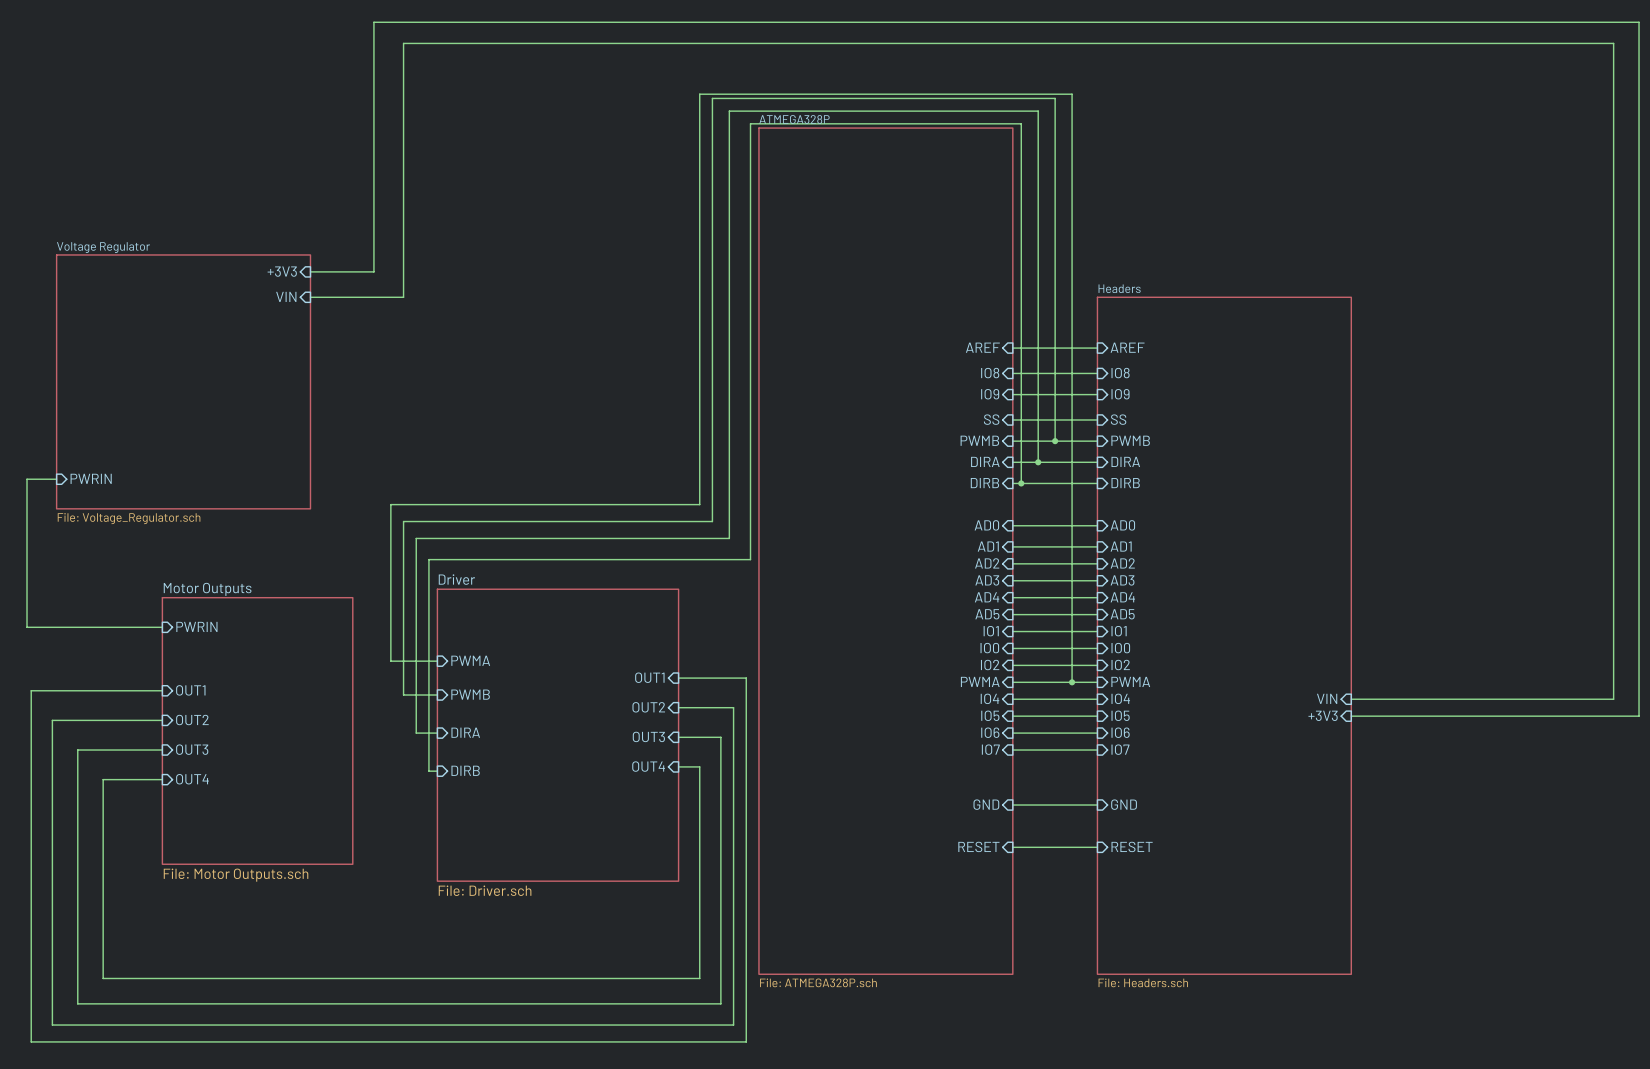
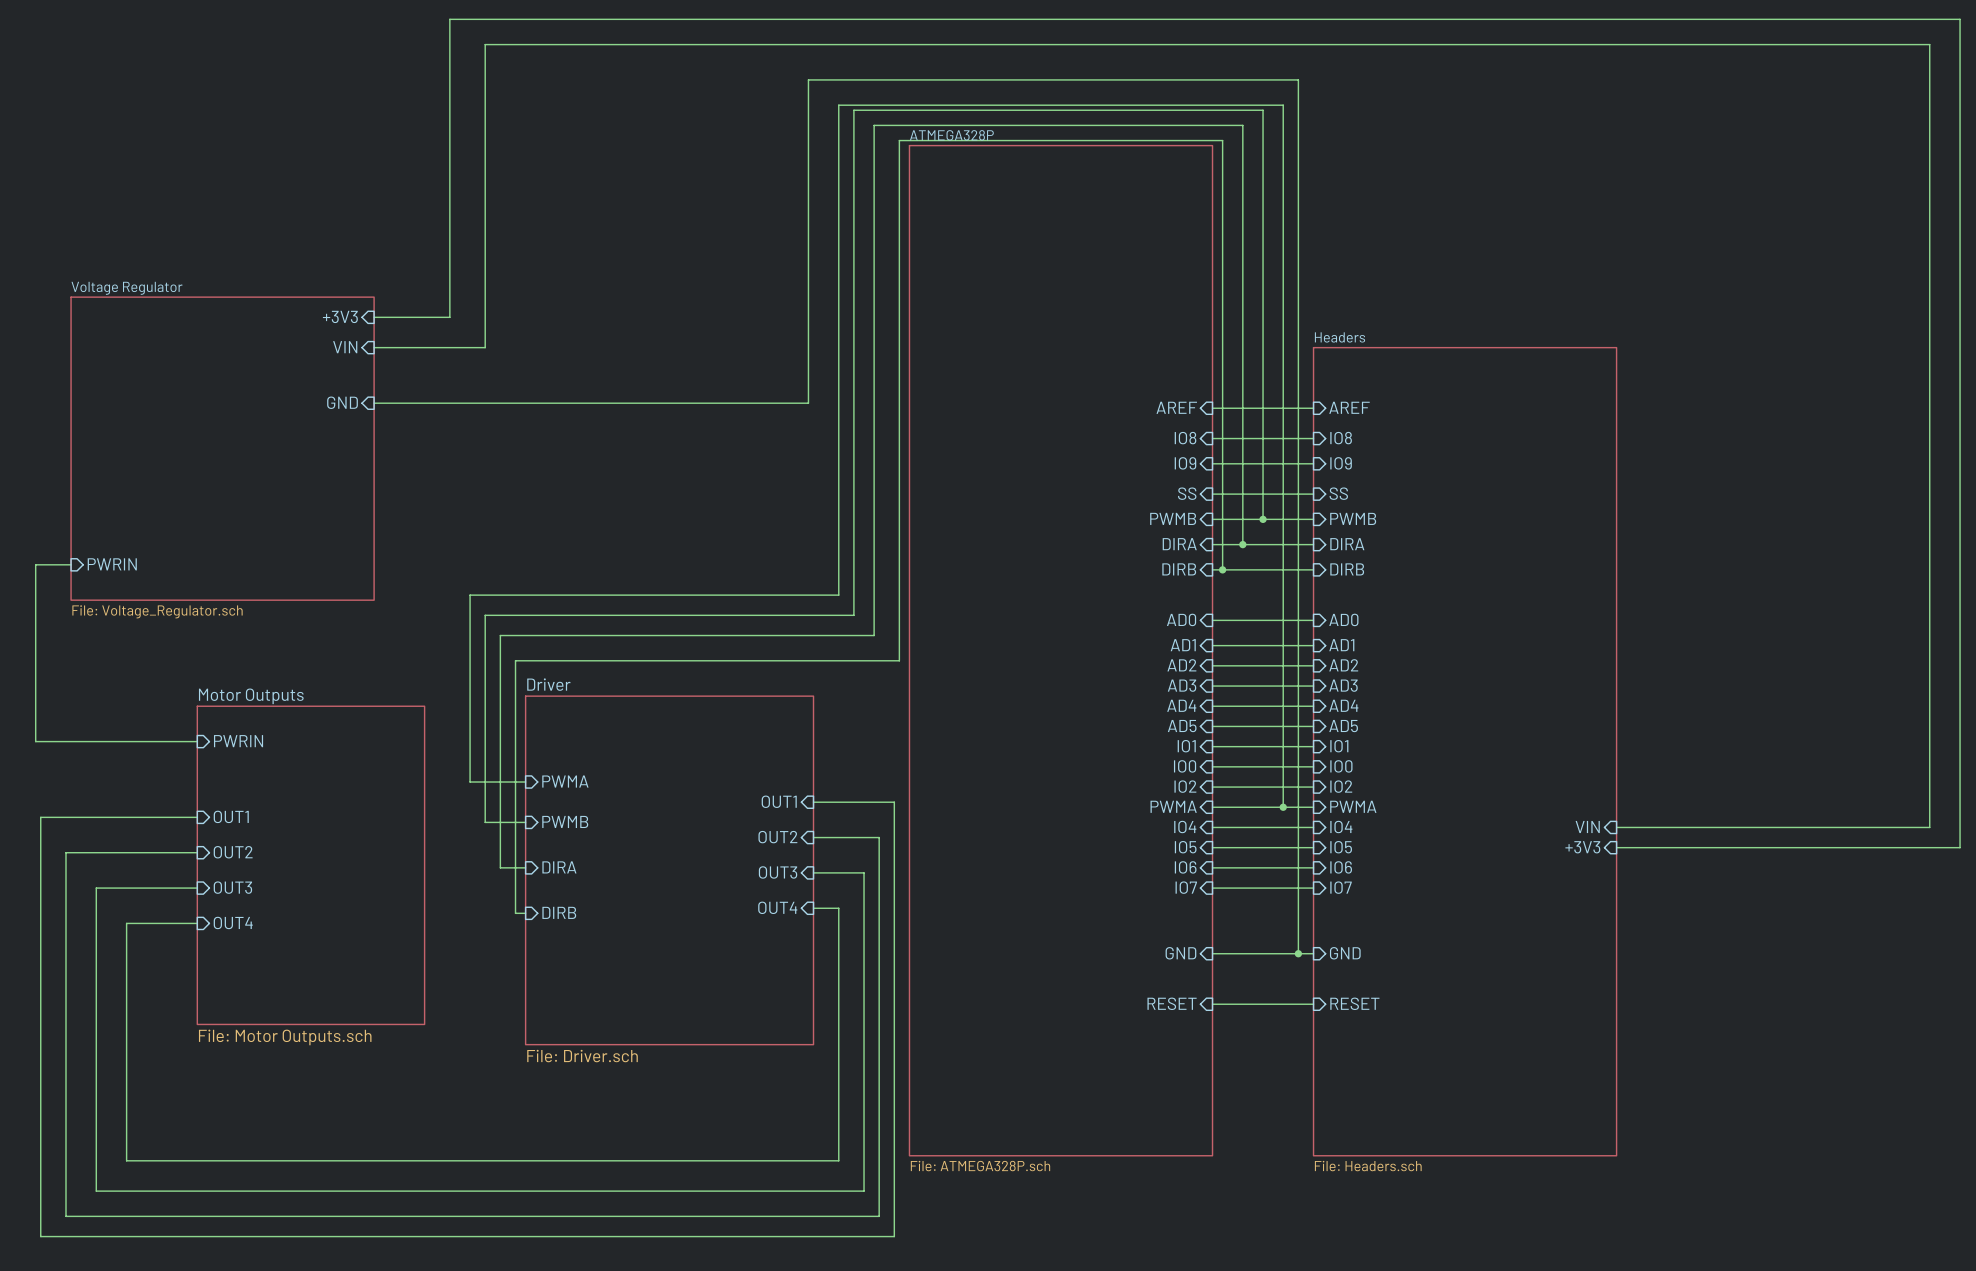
sheet pin: none -> GND (342, 402)
wire: none -> (374, 403) (808, 403) (808, 79) (1298, 79) (1298, 953)
junction: none -> (1298, 953)

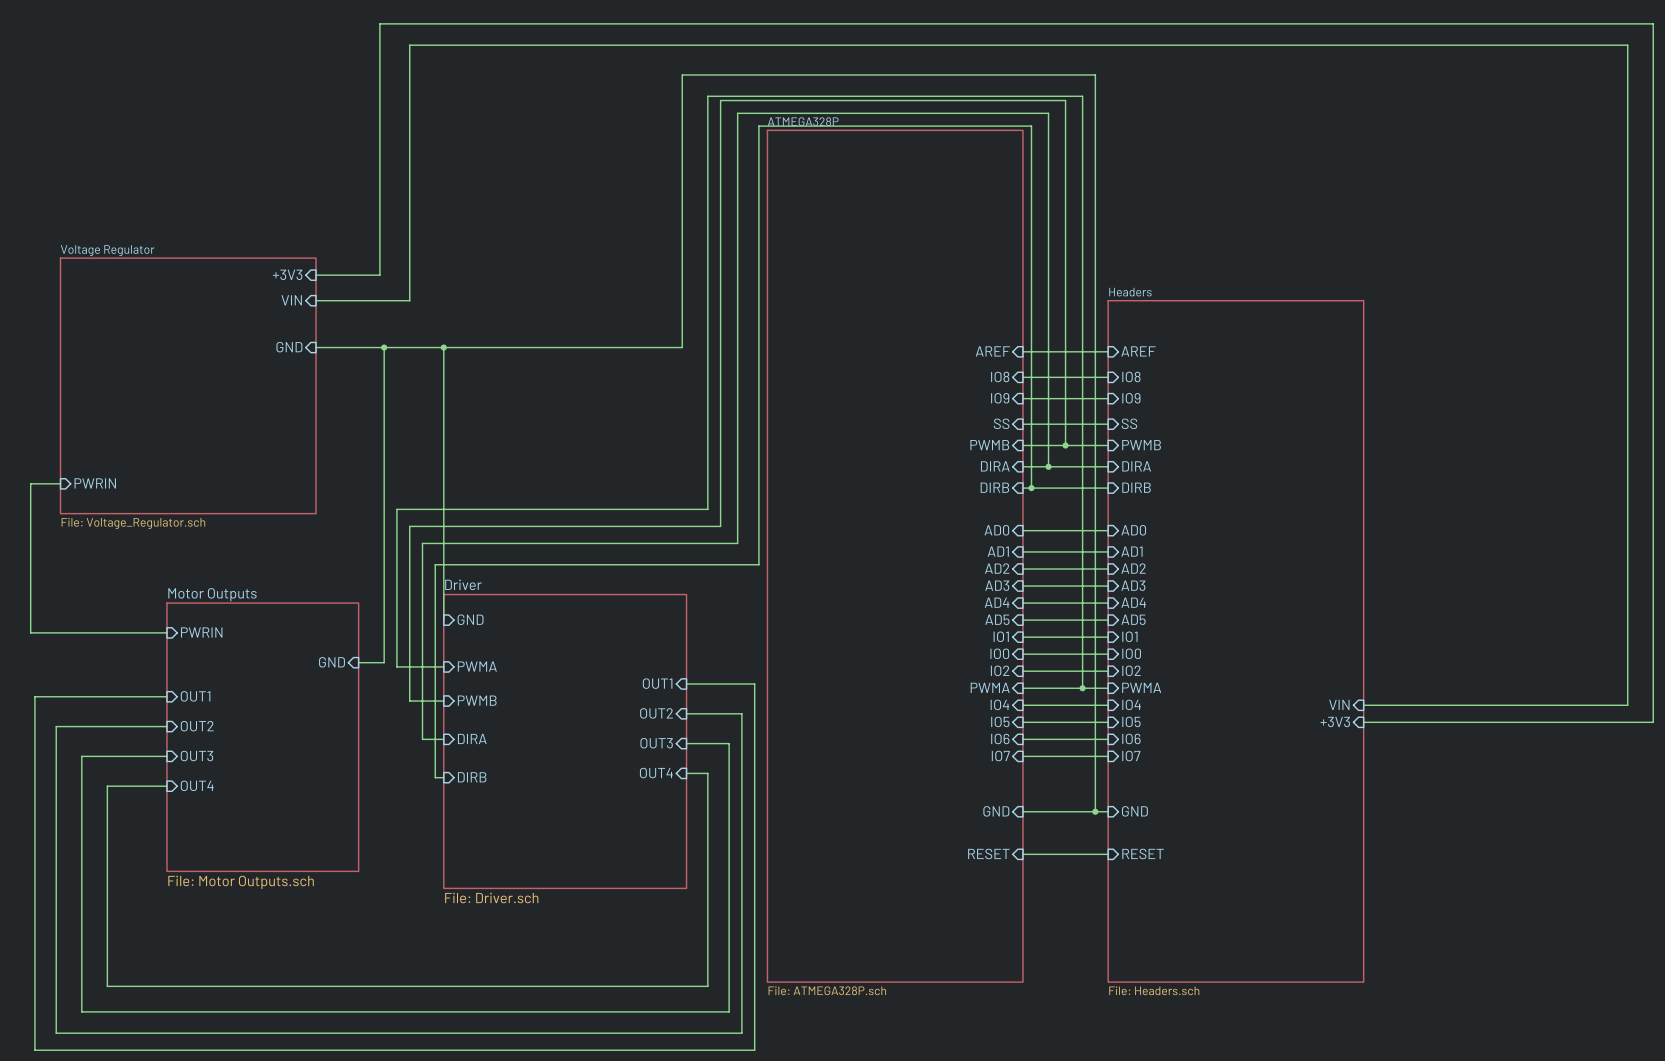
wire: none -> (384, 347) (384, 662) (358, 662)
junction: none -> (384, 347)
wire: none -> (443, 347) (443, 620)
junction: none -> (443, 347)
sheet pin: none -> GND (470, 619)
sheet pin: none -> GND (331, 662)

